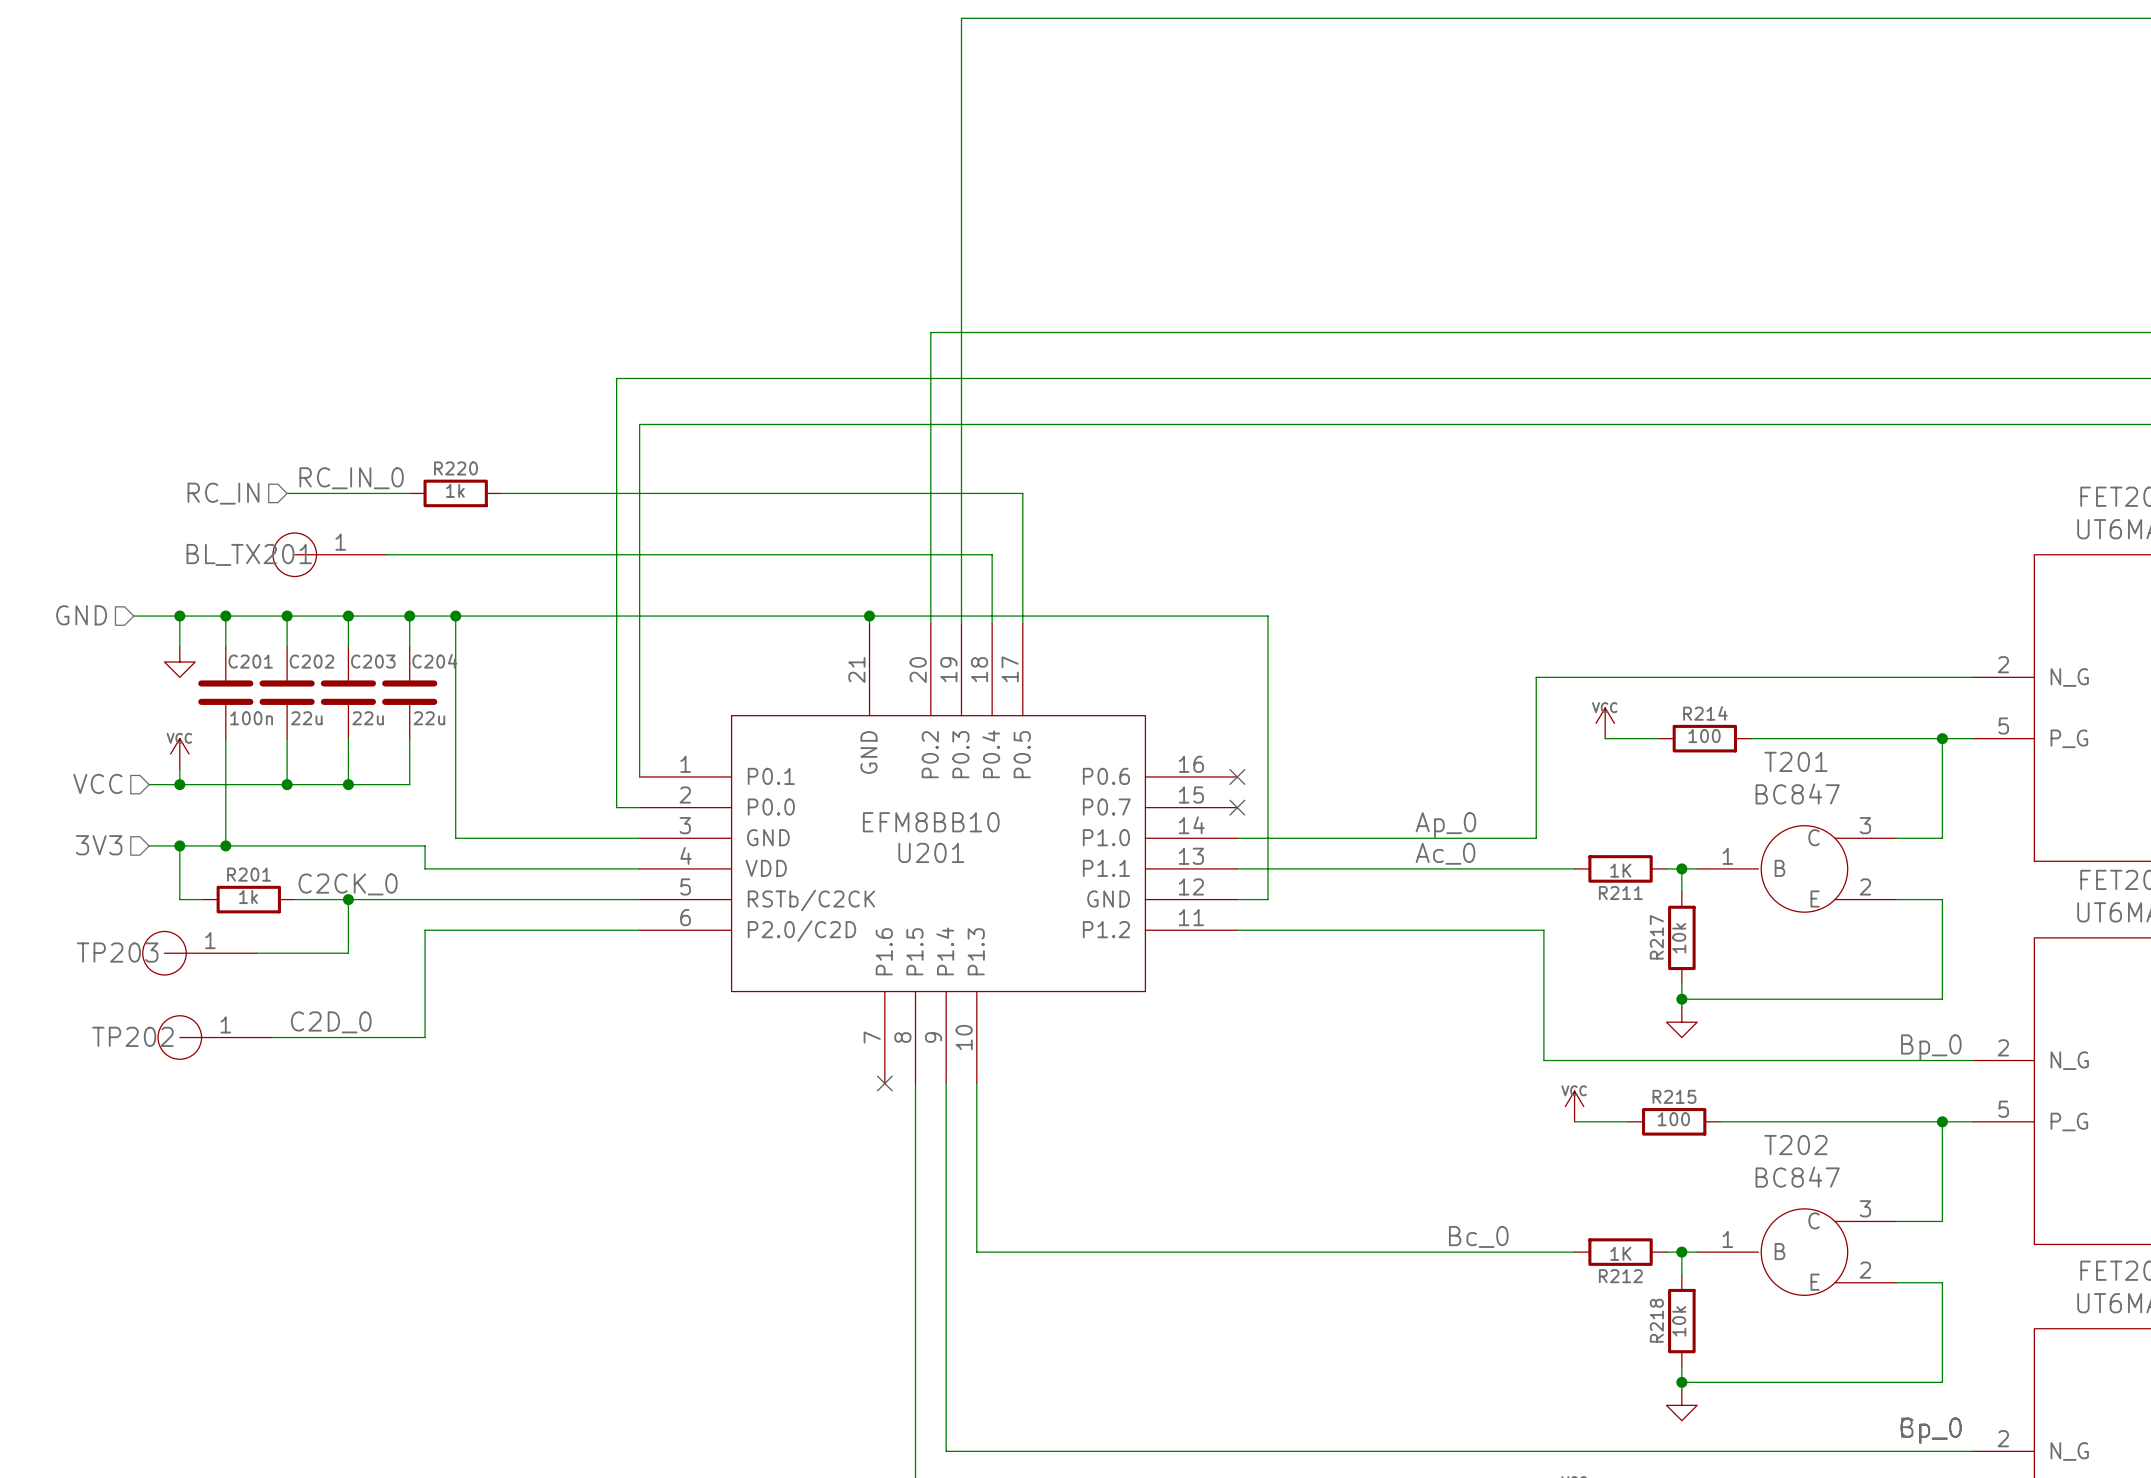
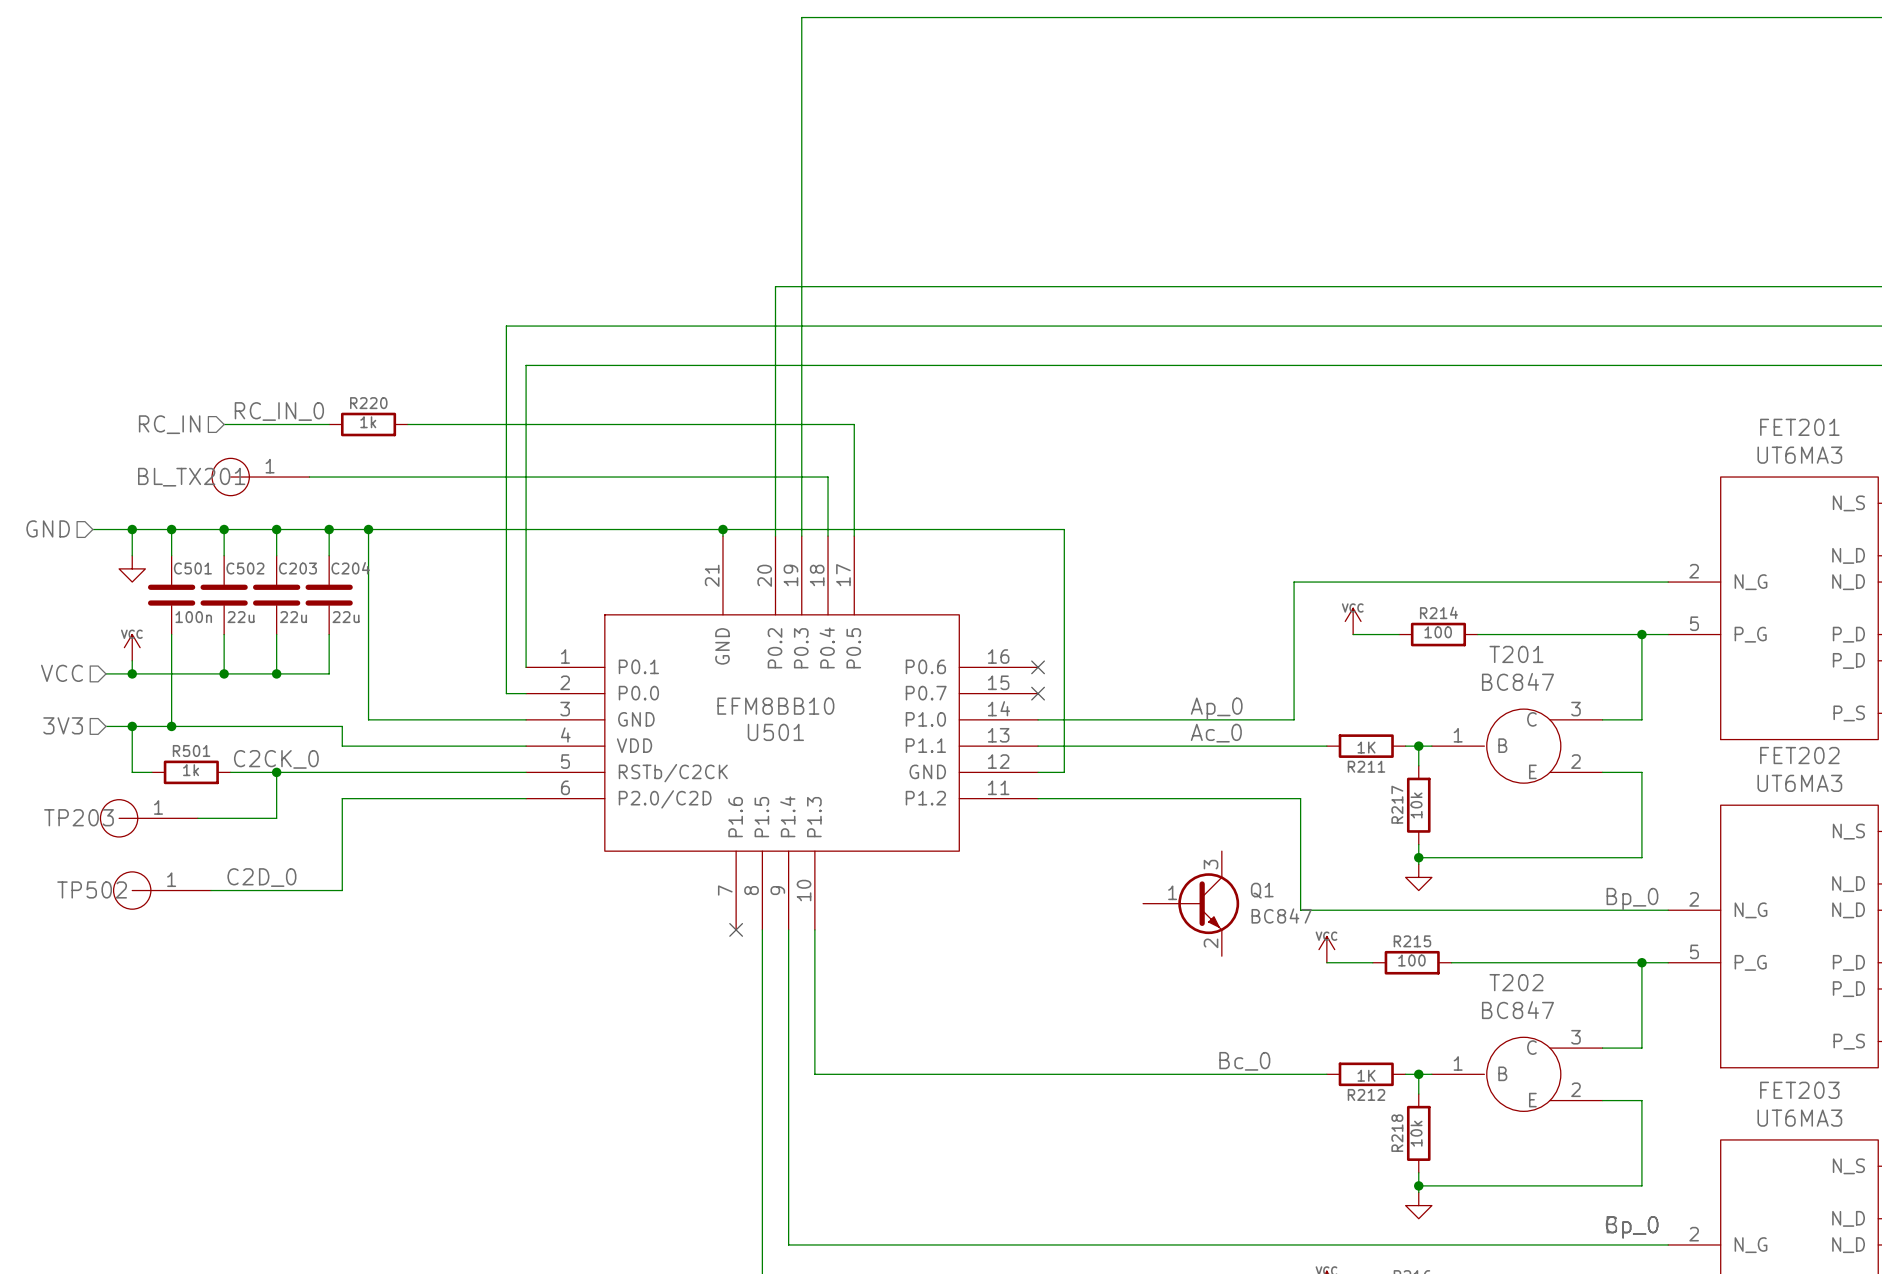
C201 name: C201 (250, 661) -> C501 (192, 568)
C202 name: C202 (311, 661) -> C502 (245, 568)
U201 name: U201 (931, 852) -> U501 (775, 732)
R201 name: R201 (249, 874) -> R501 (191, 750)
TP202 name: TP202 (132, 1036) -> TP502 (92, 889)
Q1: none -> BC847 (1191, 903)

